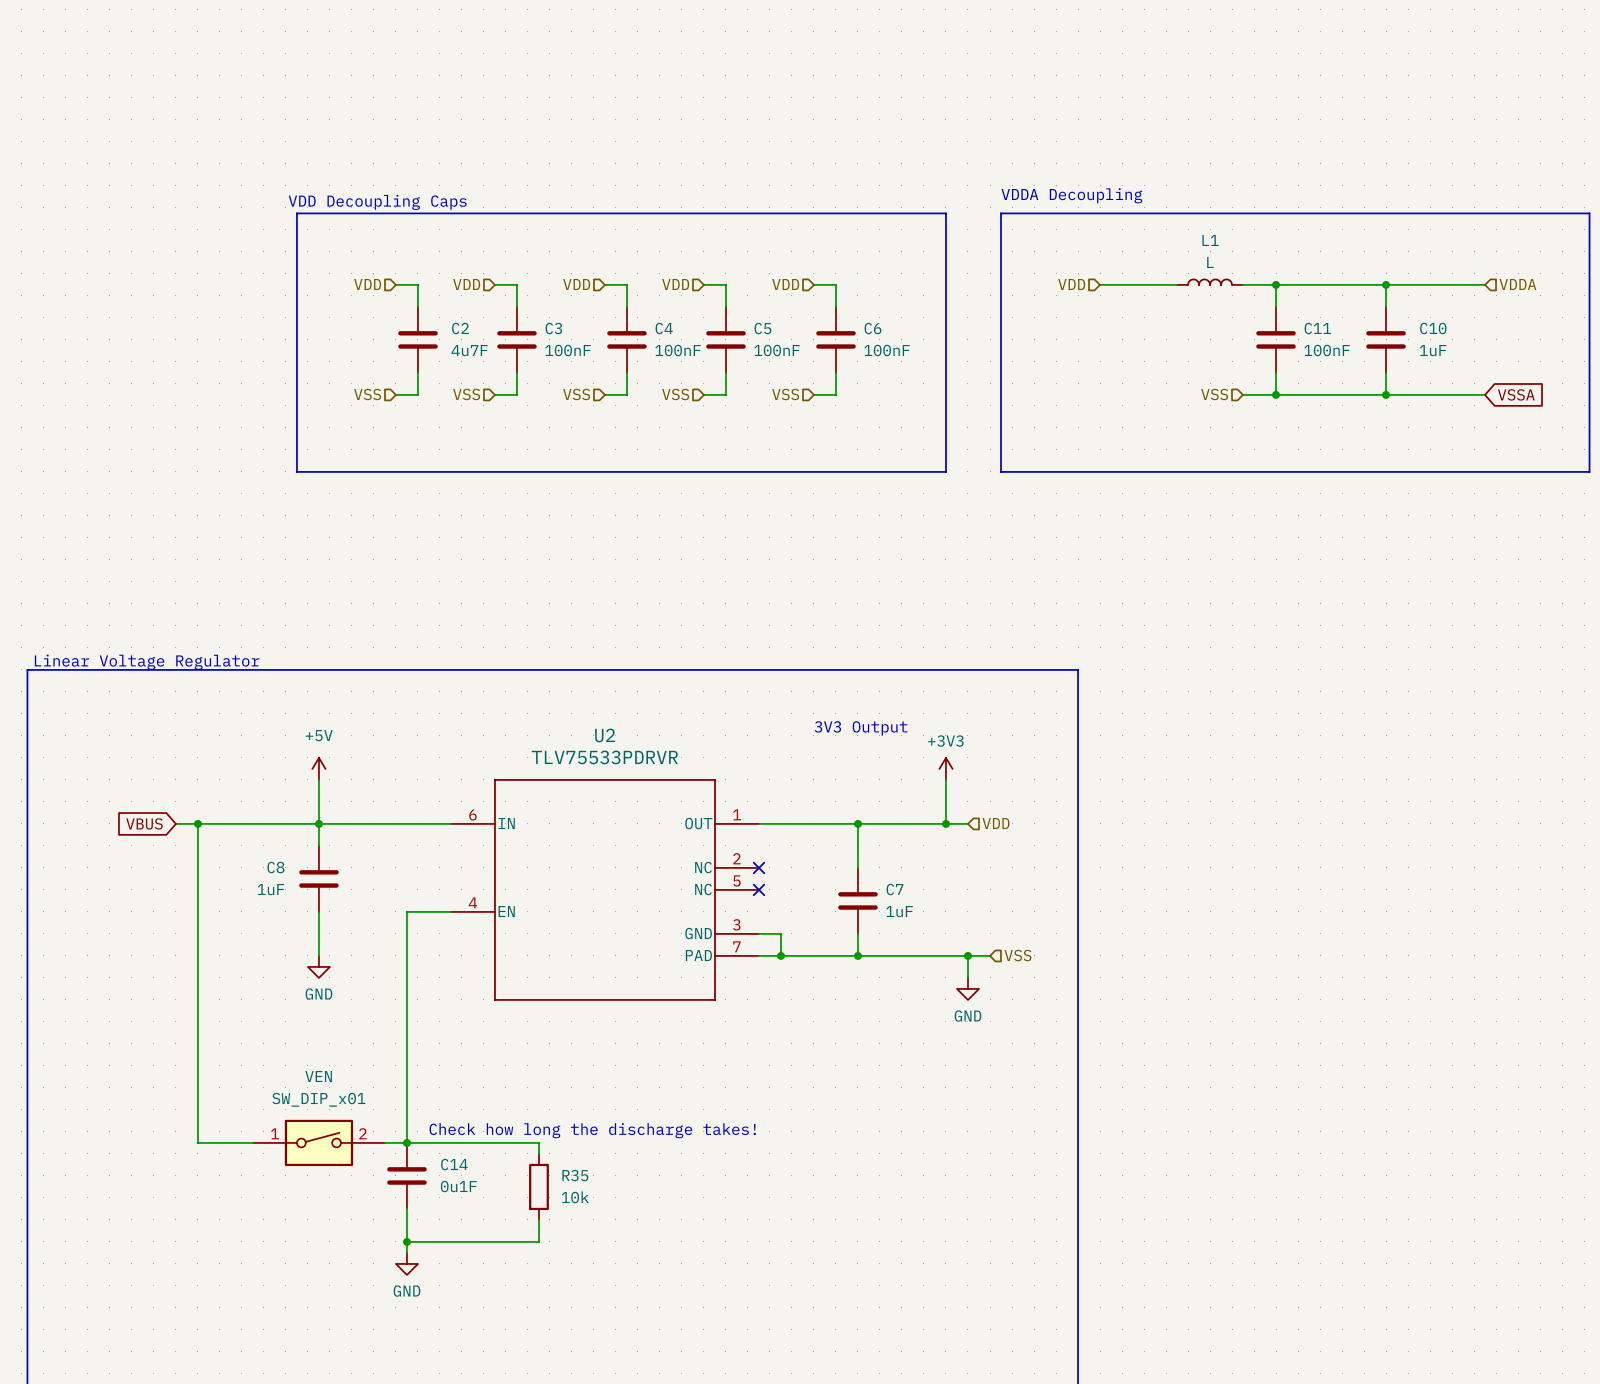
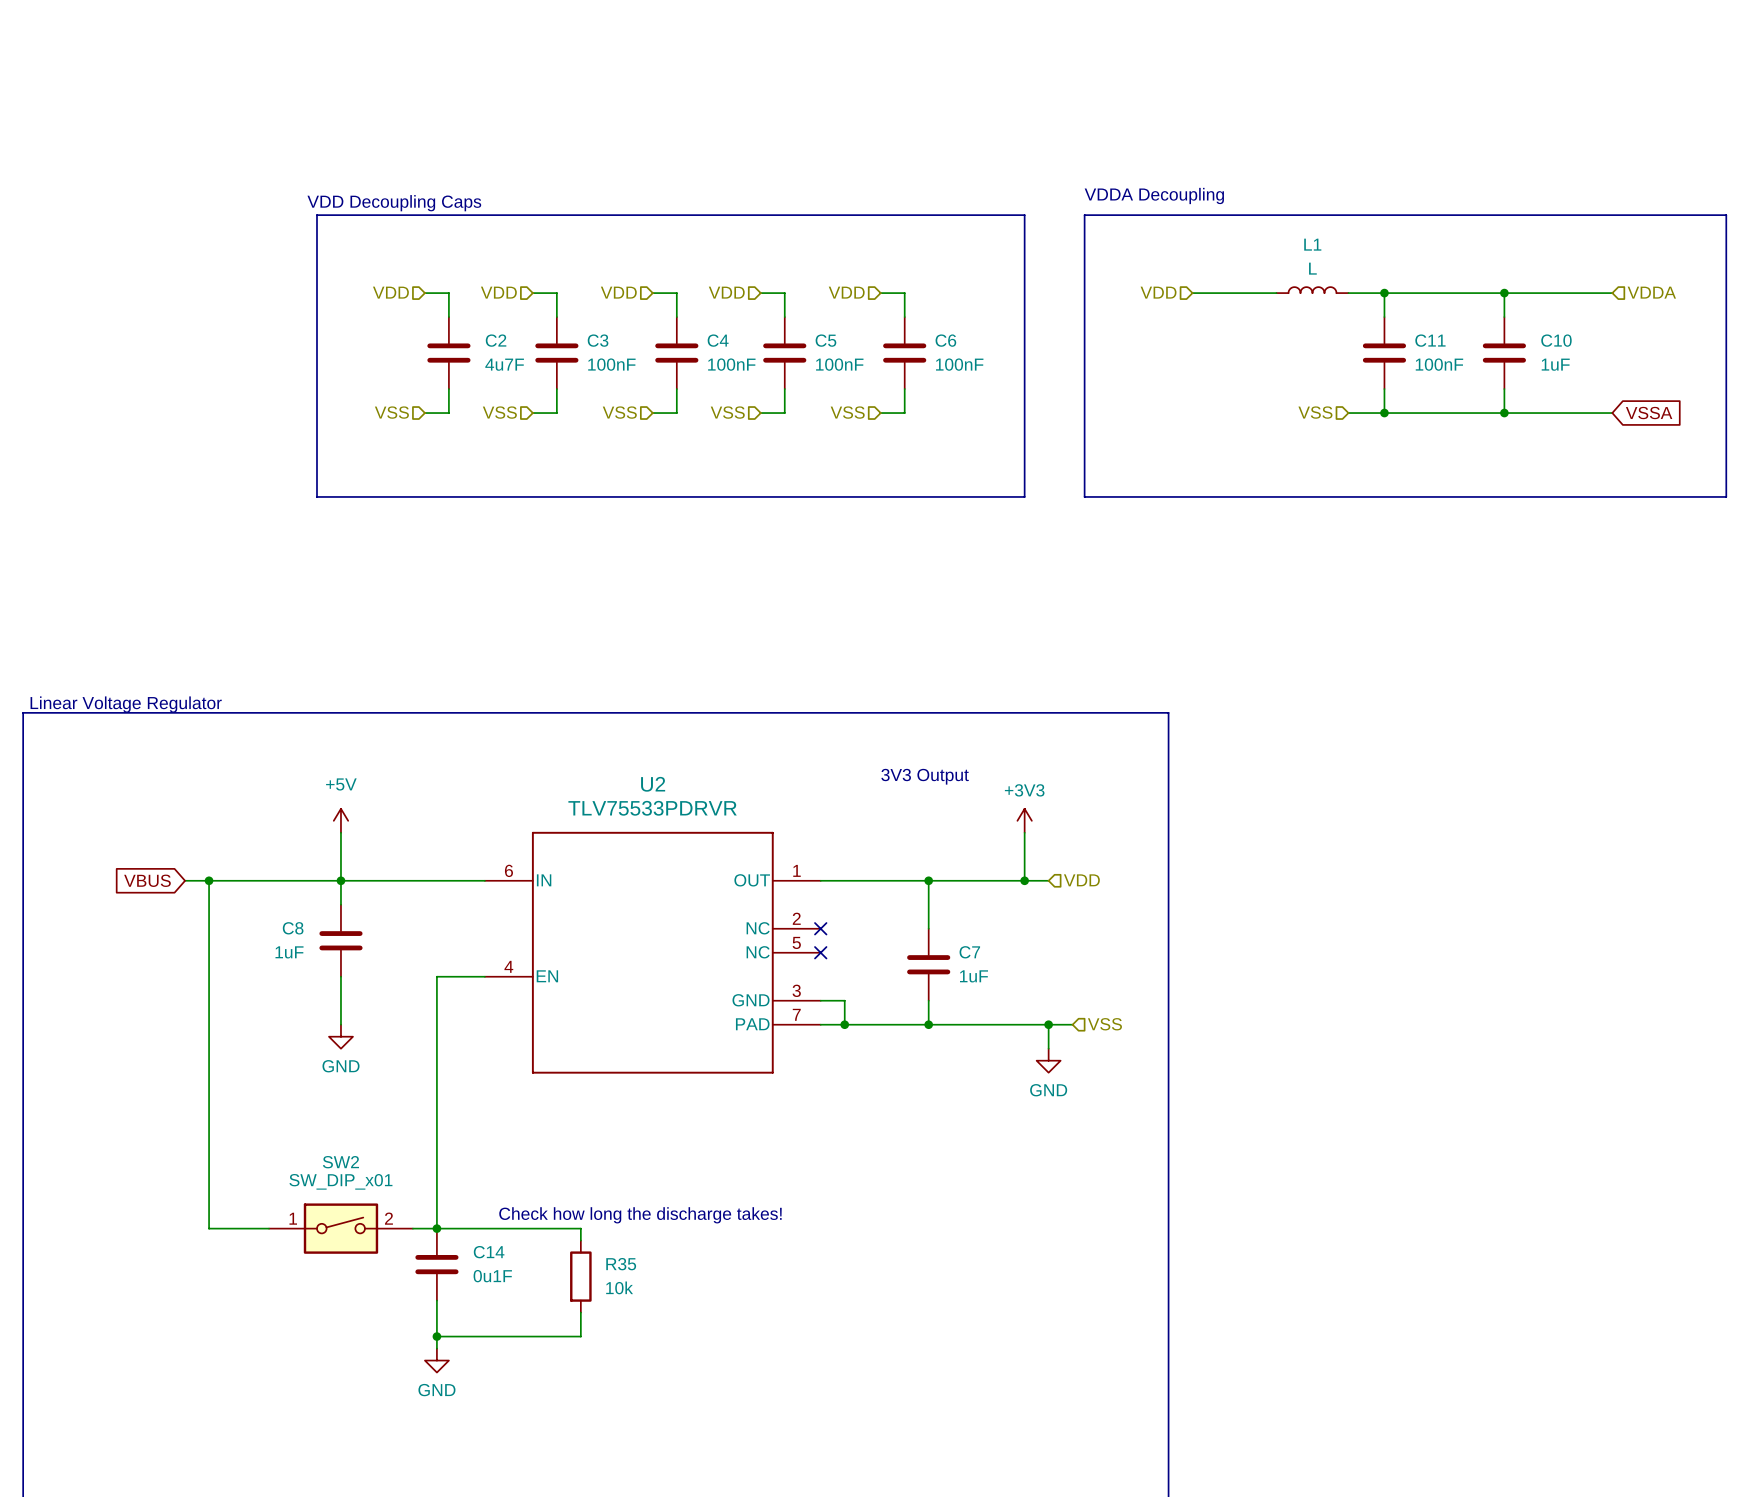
VEN name: VEN (318, 1076) -> SW2 (340, 1162)

